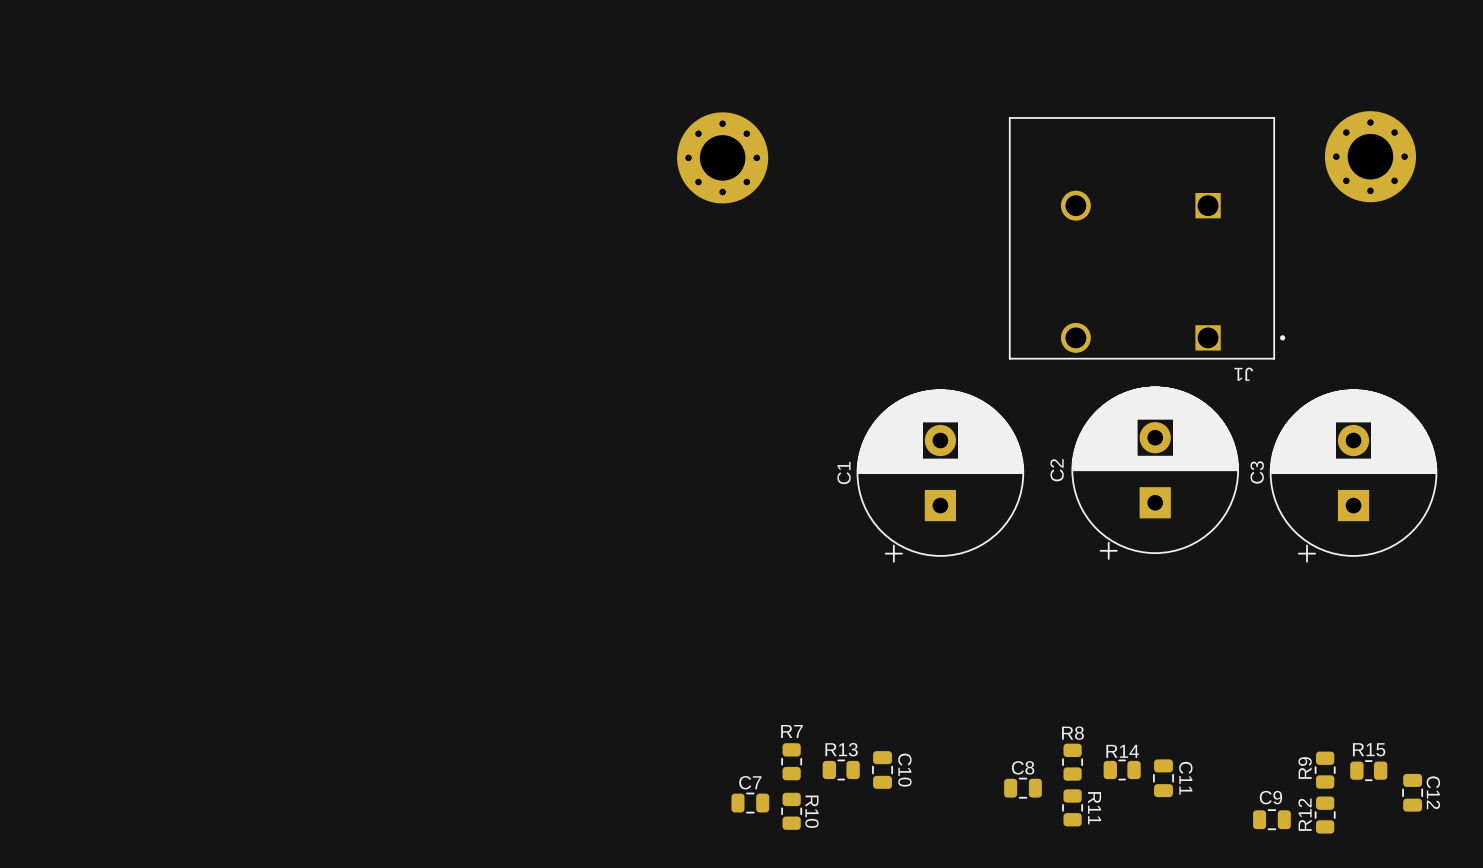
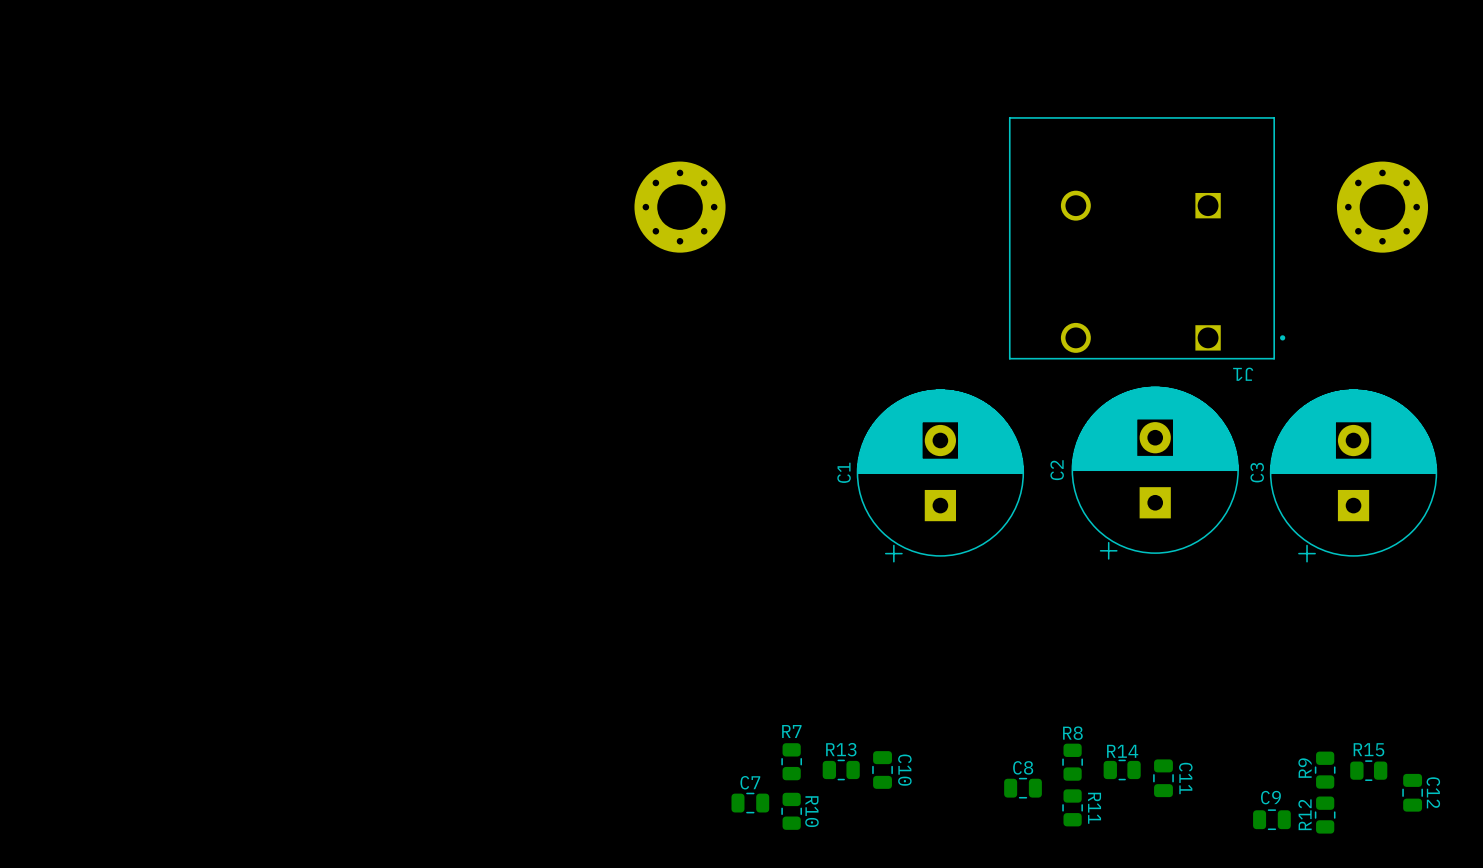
part position: (1370, 156) -> (1382, 207)
part position: (722, 157) -> (680, 207)

